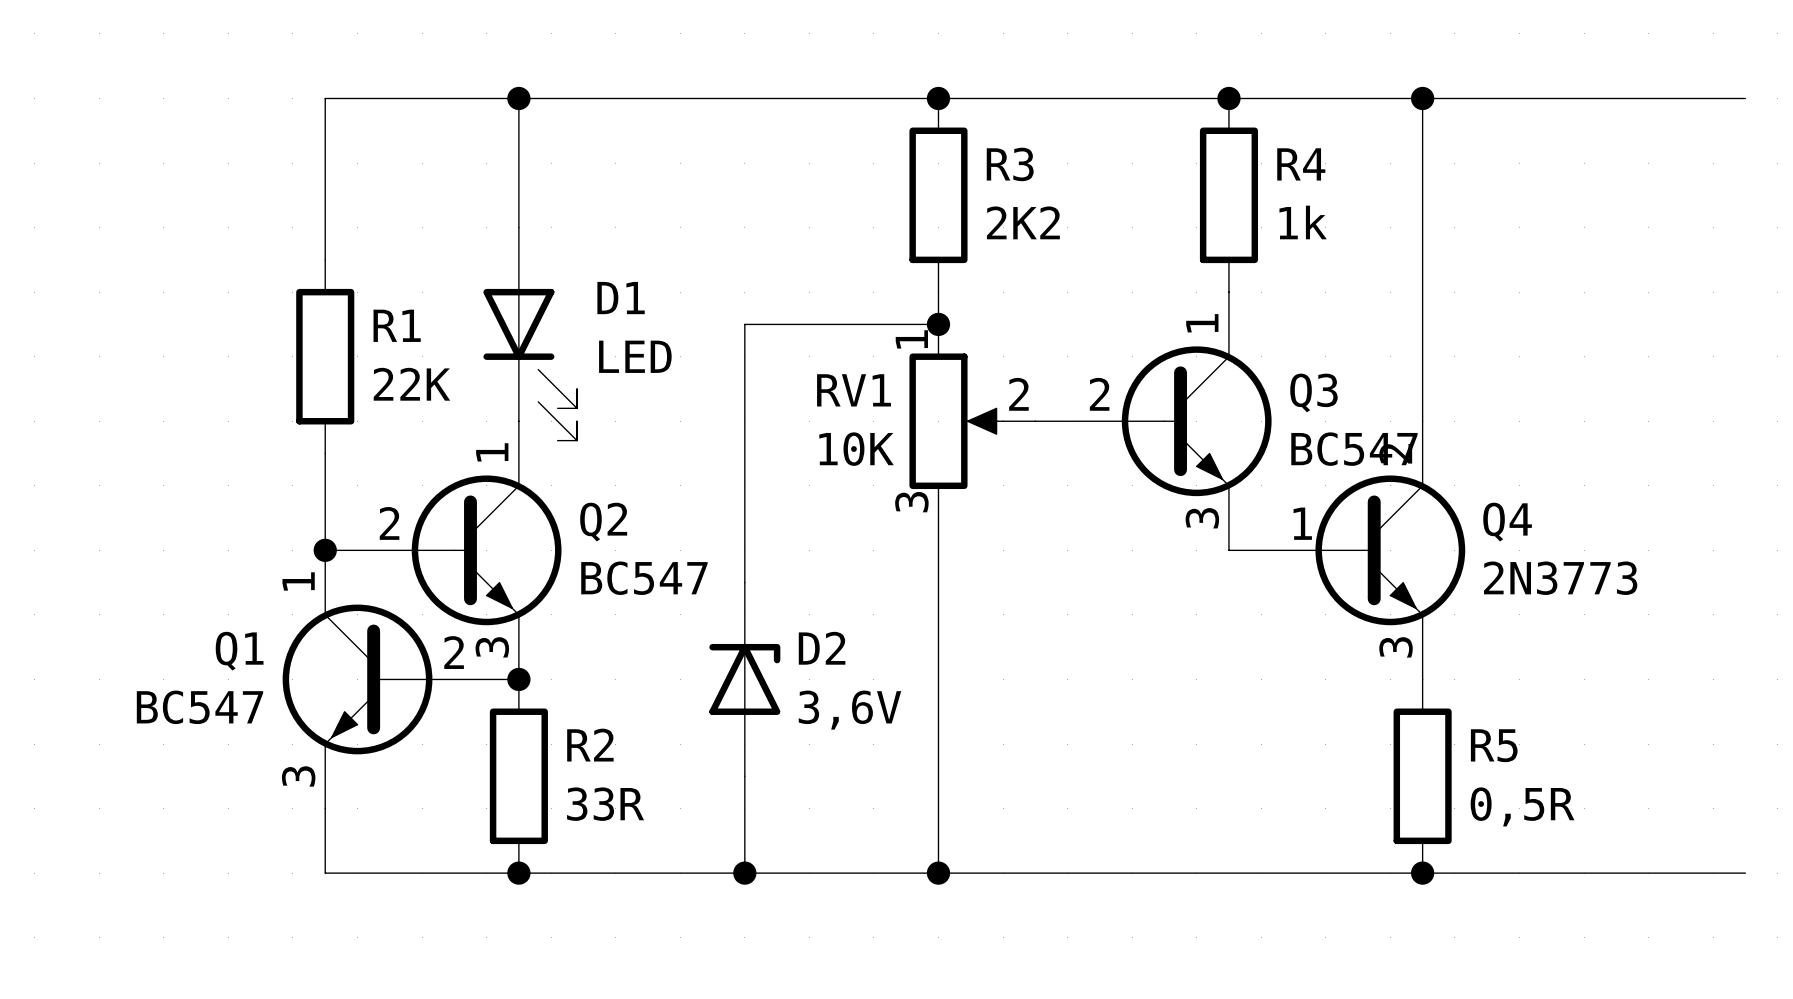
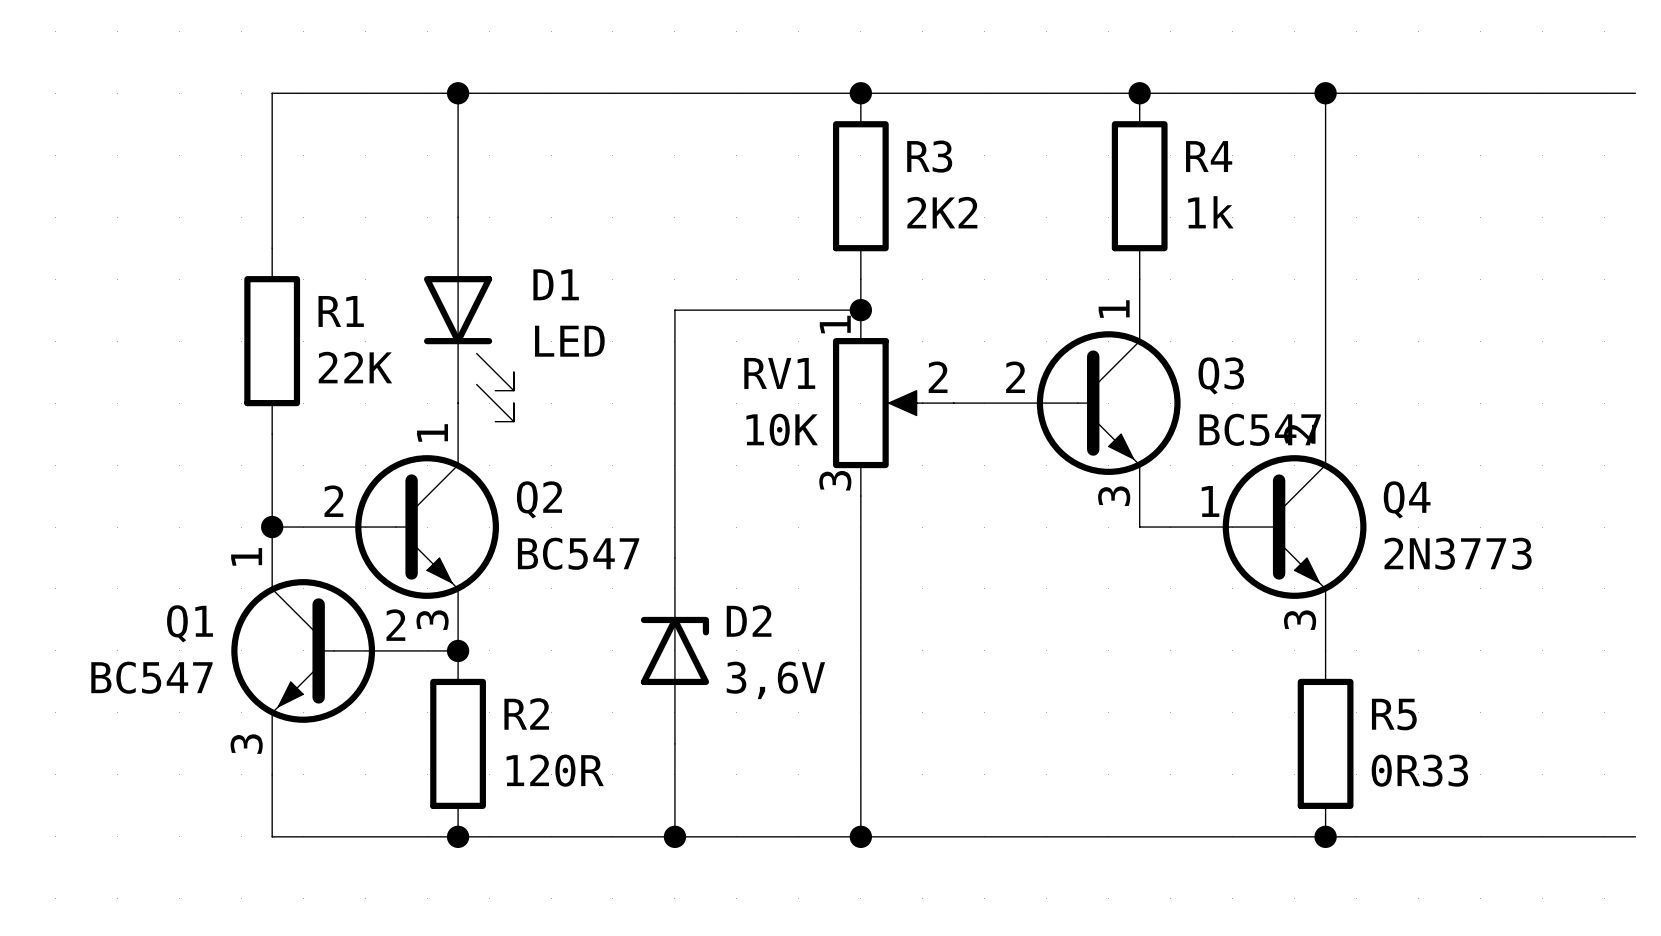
R2 value: 33R (605, 804) -> 120R (555, 770)
R5 value: 0,5R (1522, 806) -> 0R33 (1419, 770)

